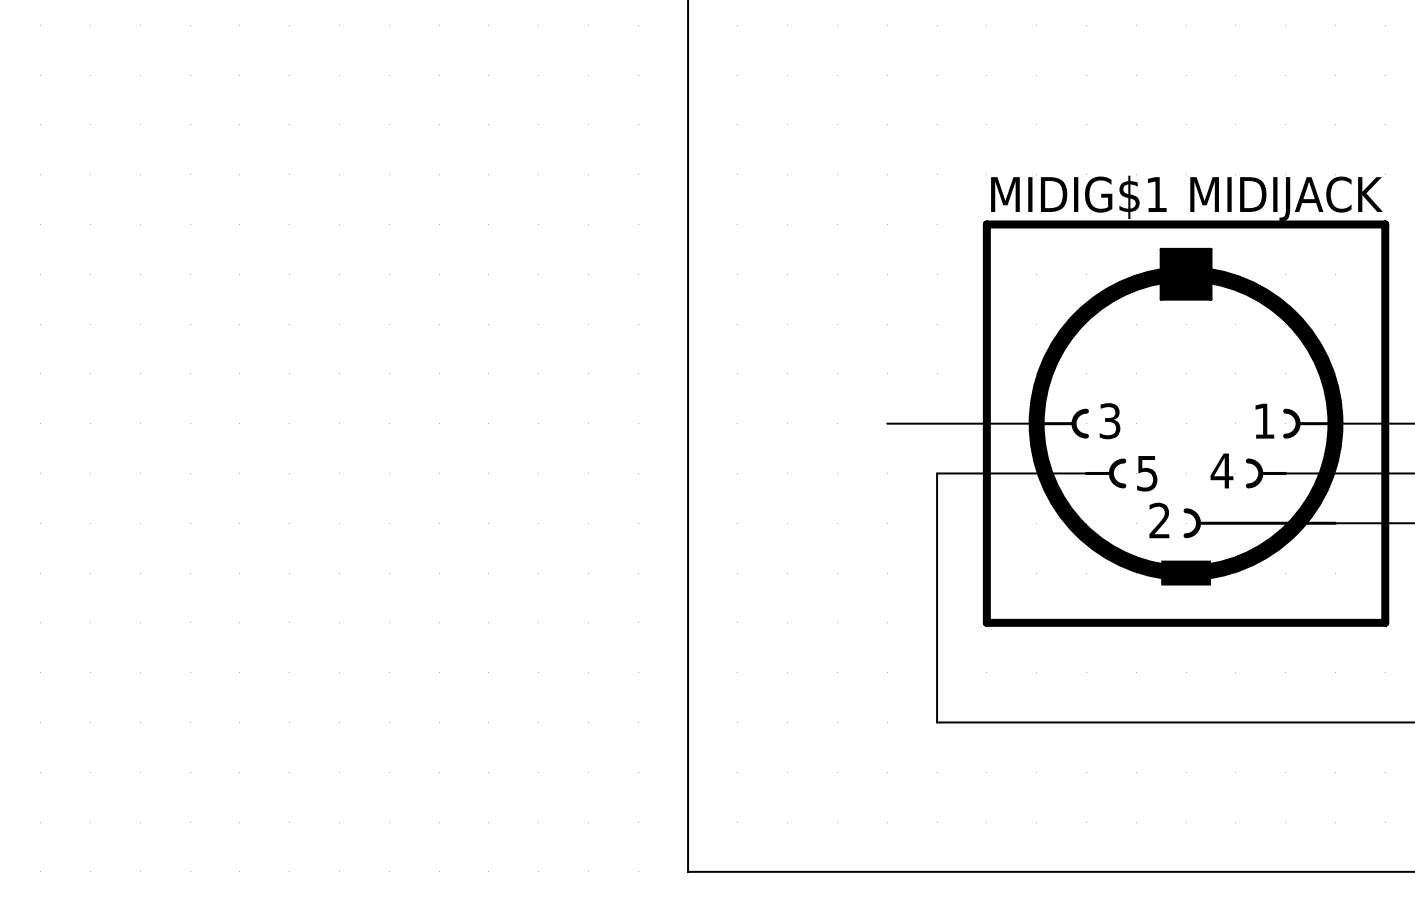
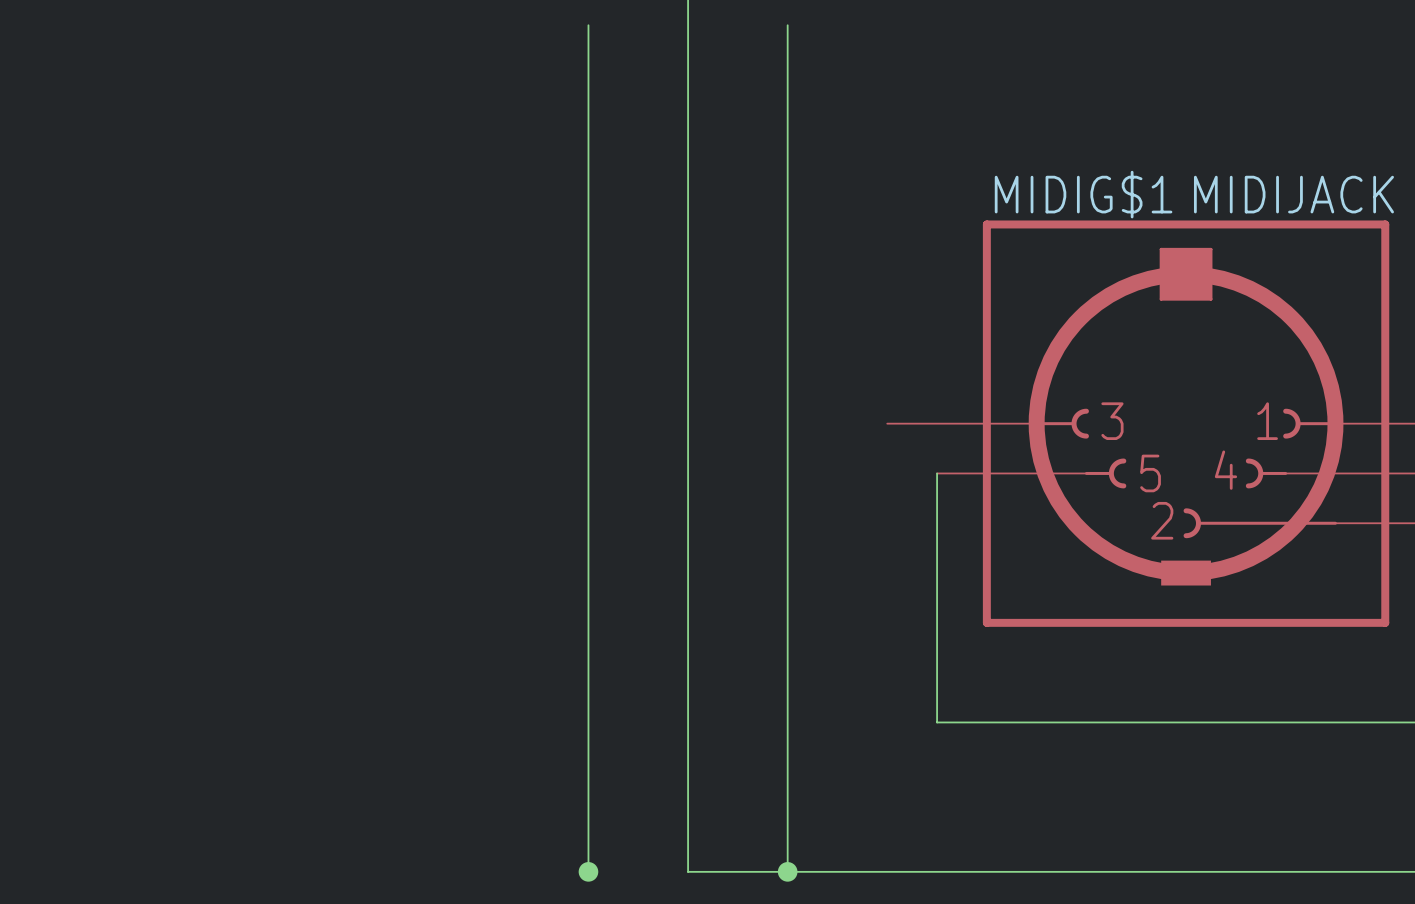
wire: none -> (588, 25) (588, 871)
wire: none -> (787, 25) (787, 871)
junction: none -> (588, 871)
junction: none -> (787, 871)

